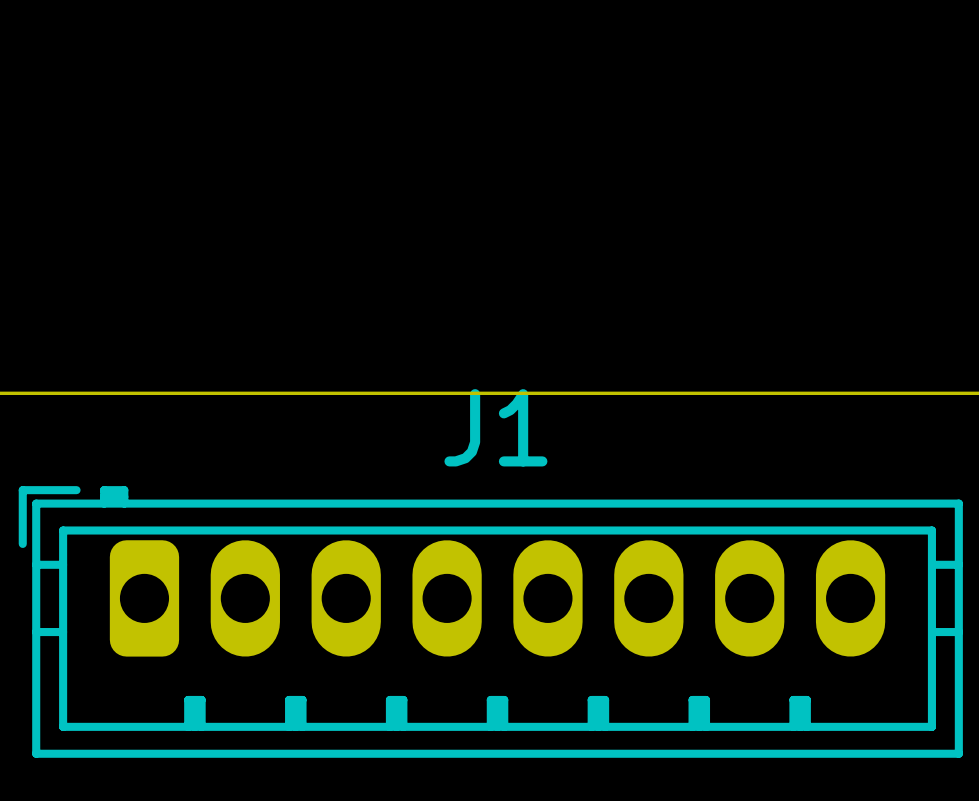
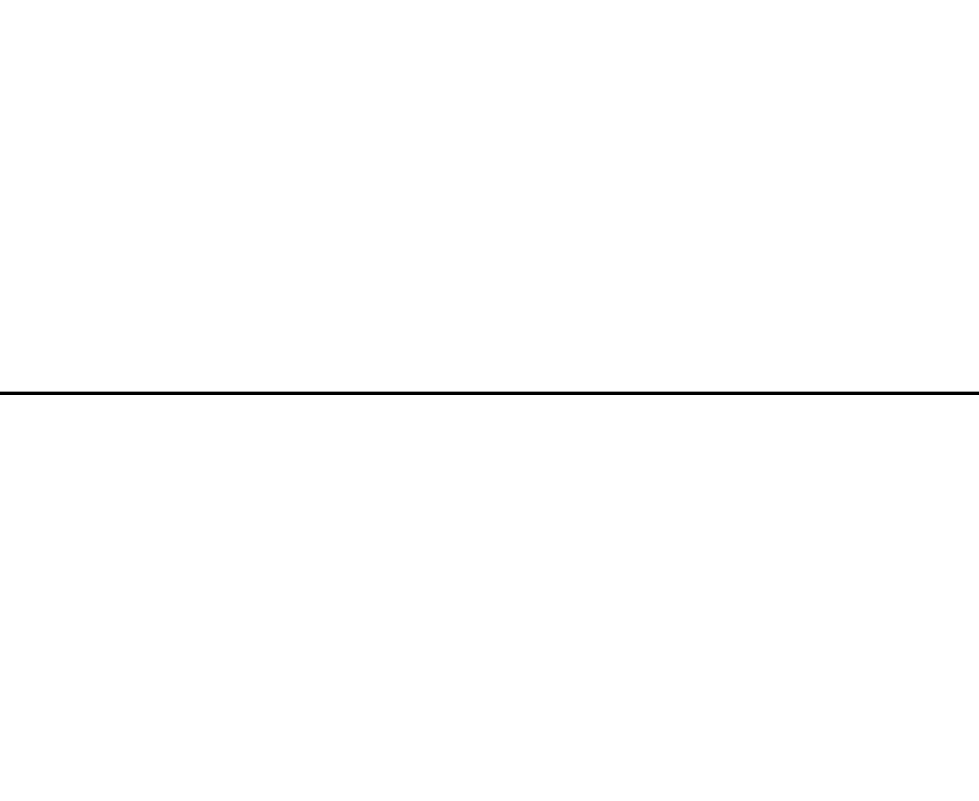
J1: (490, 621) -> none

